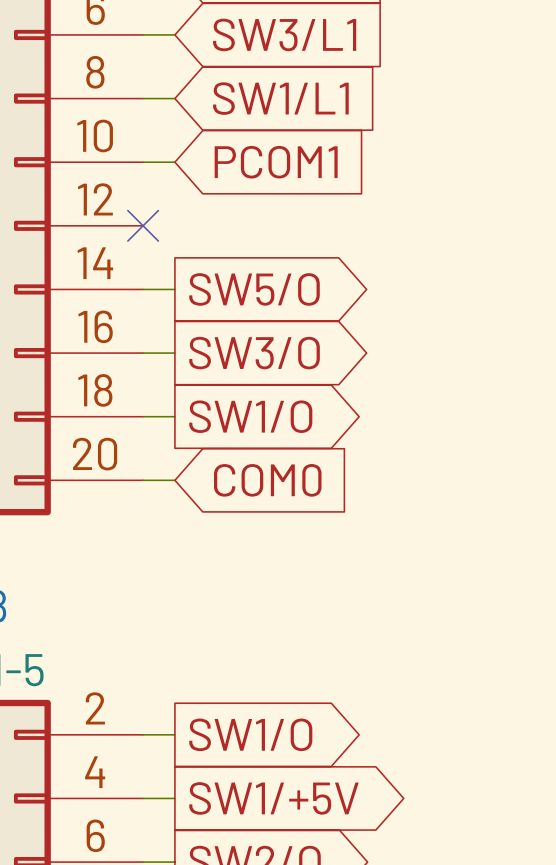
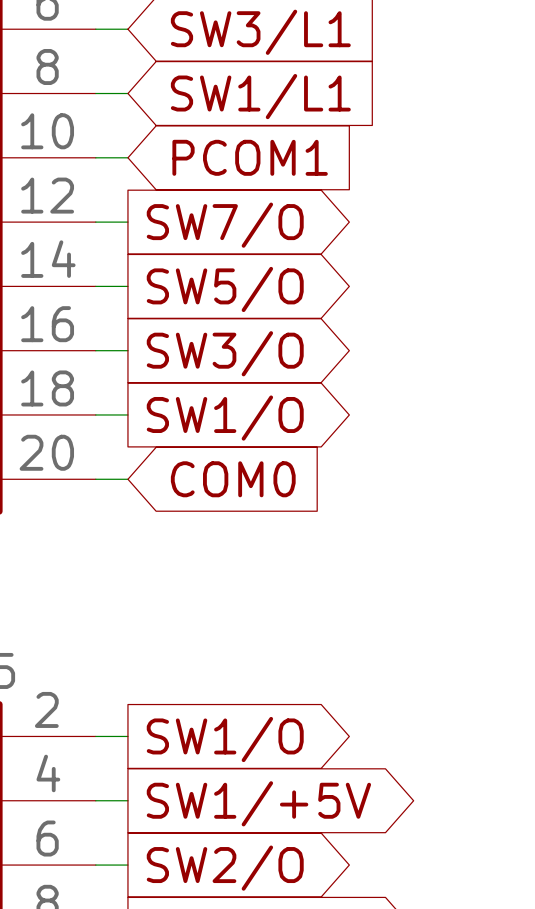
wire: none -> (95, 222) (127, 222)
no-connect mark: (143, 225) -> none
global label: none -> SW7/O (225, 225)

